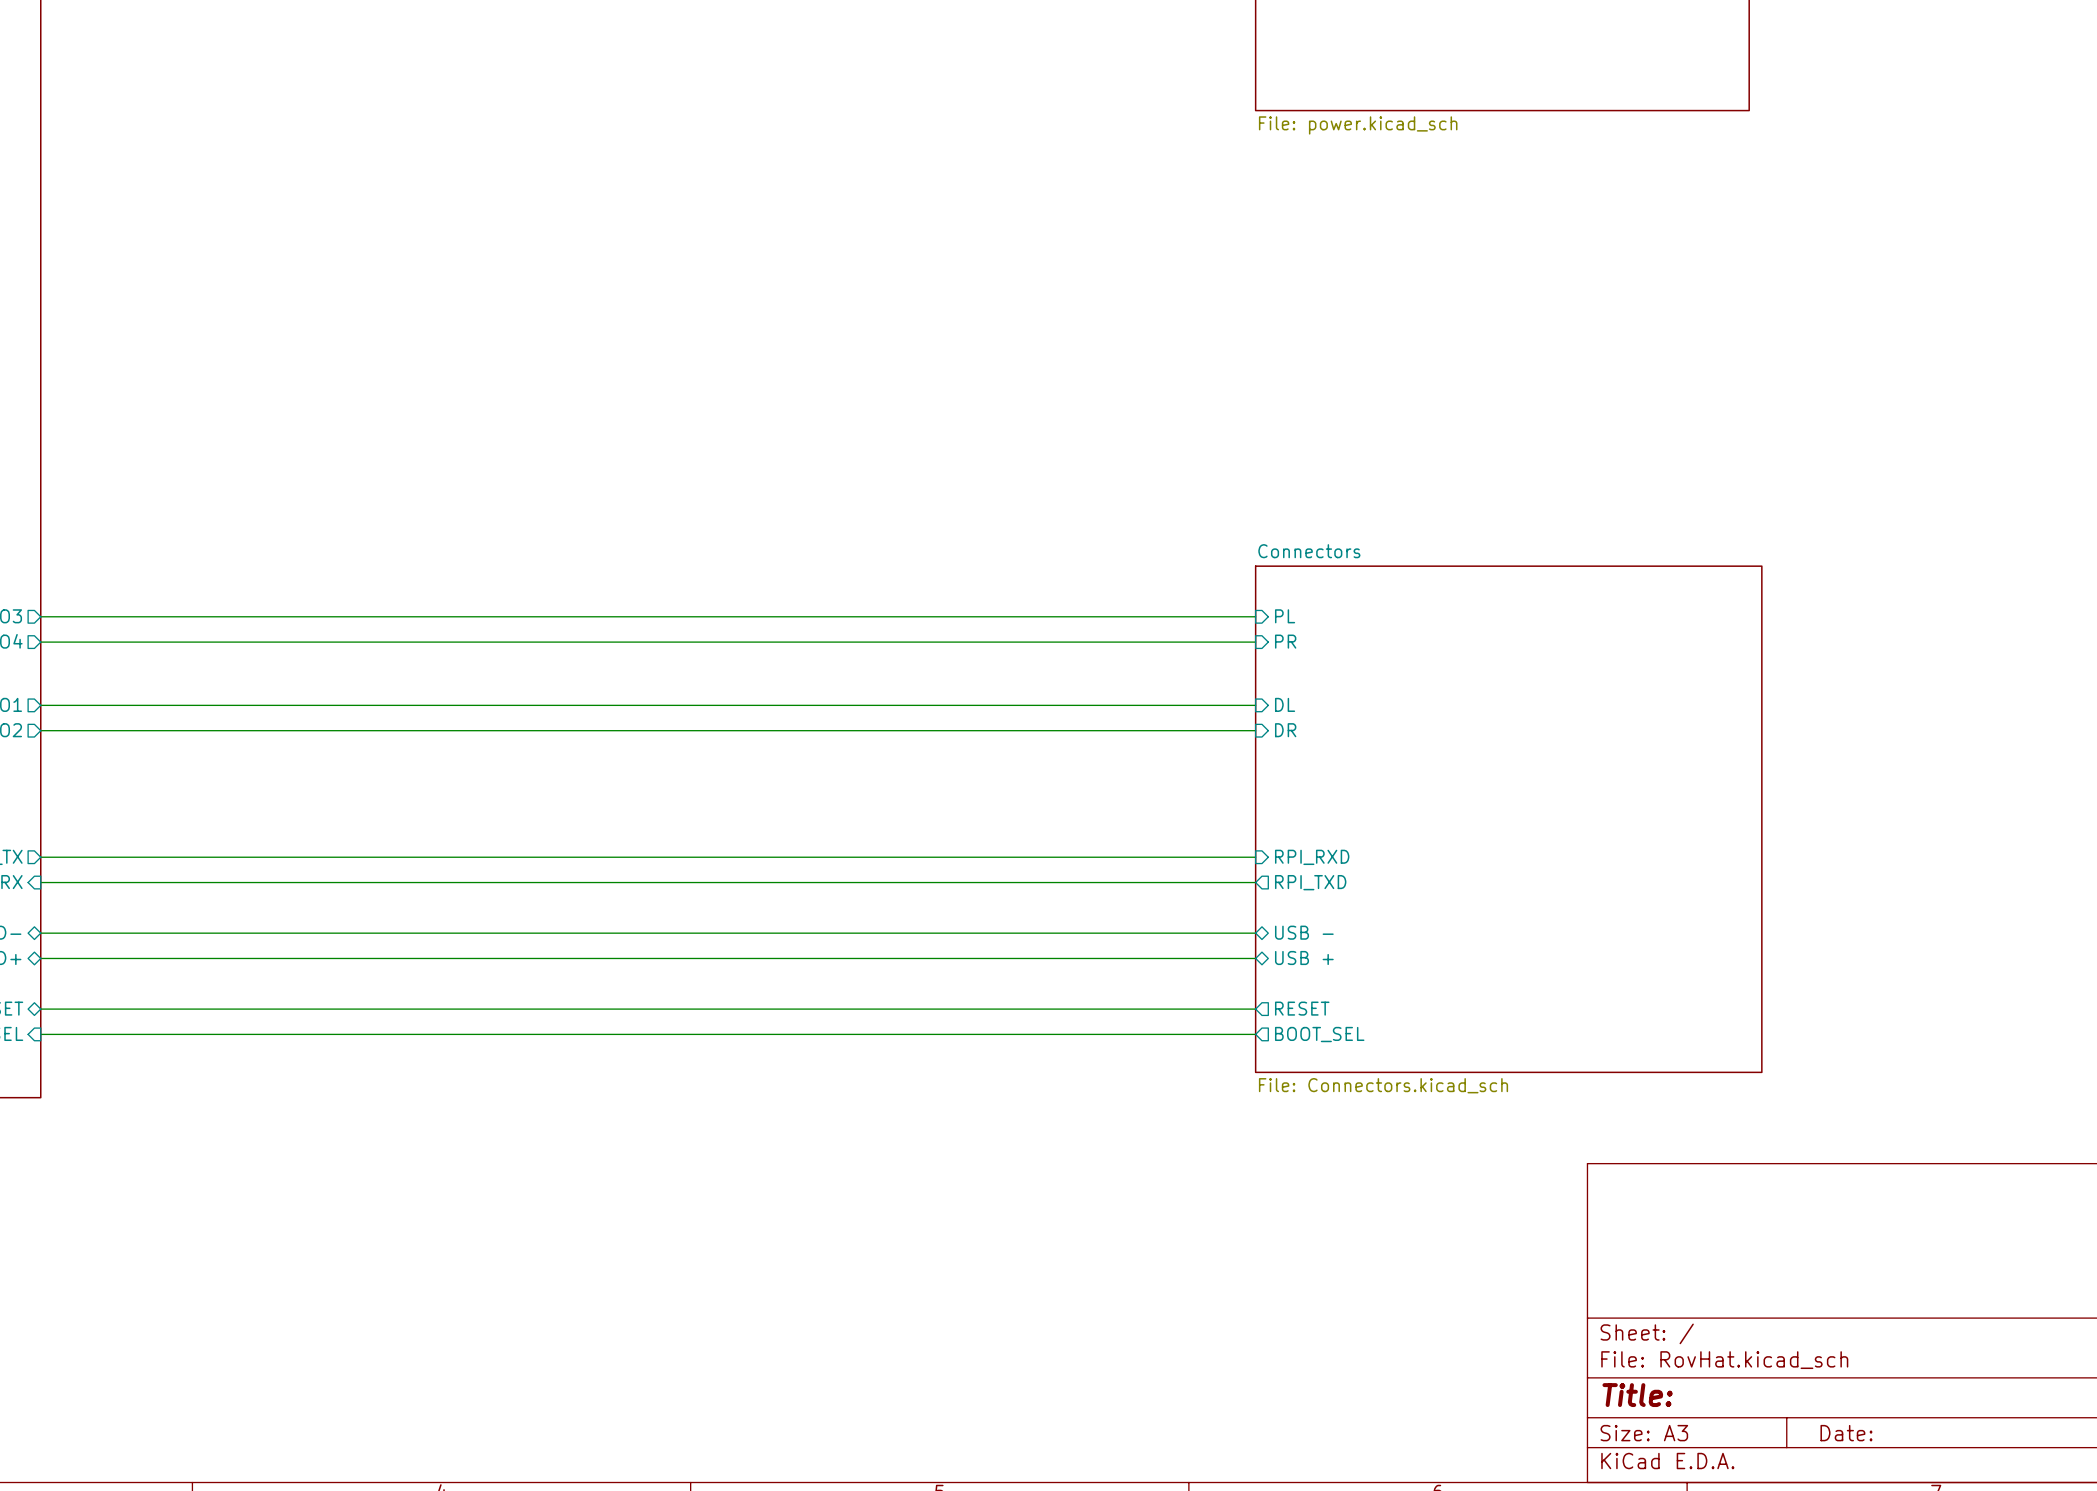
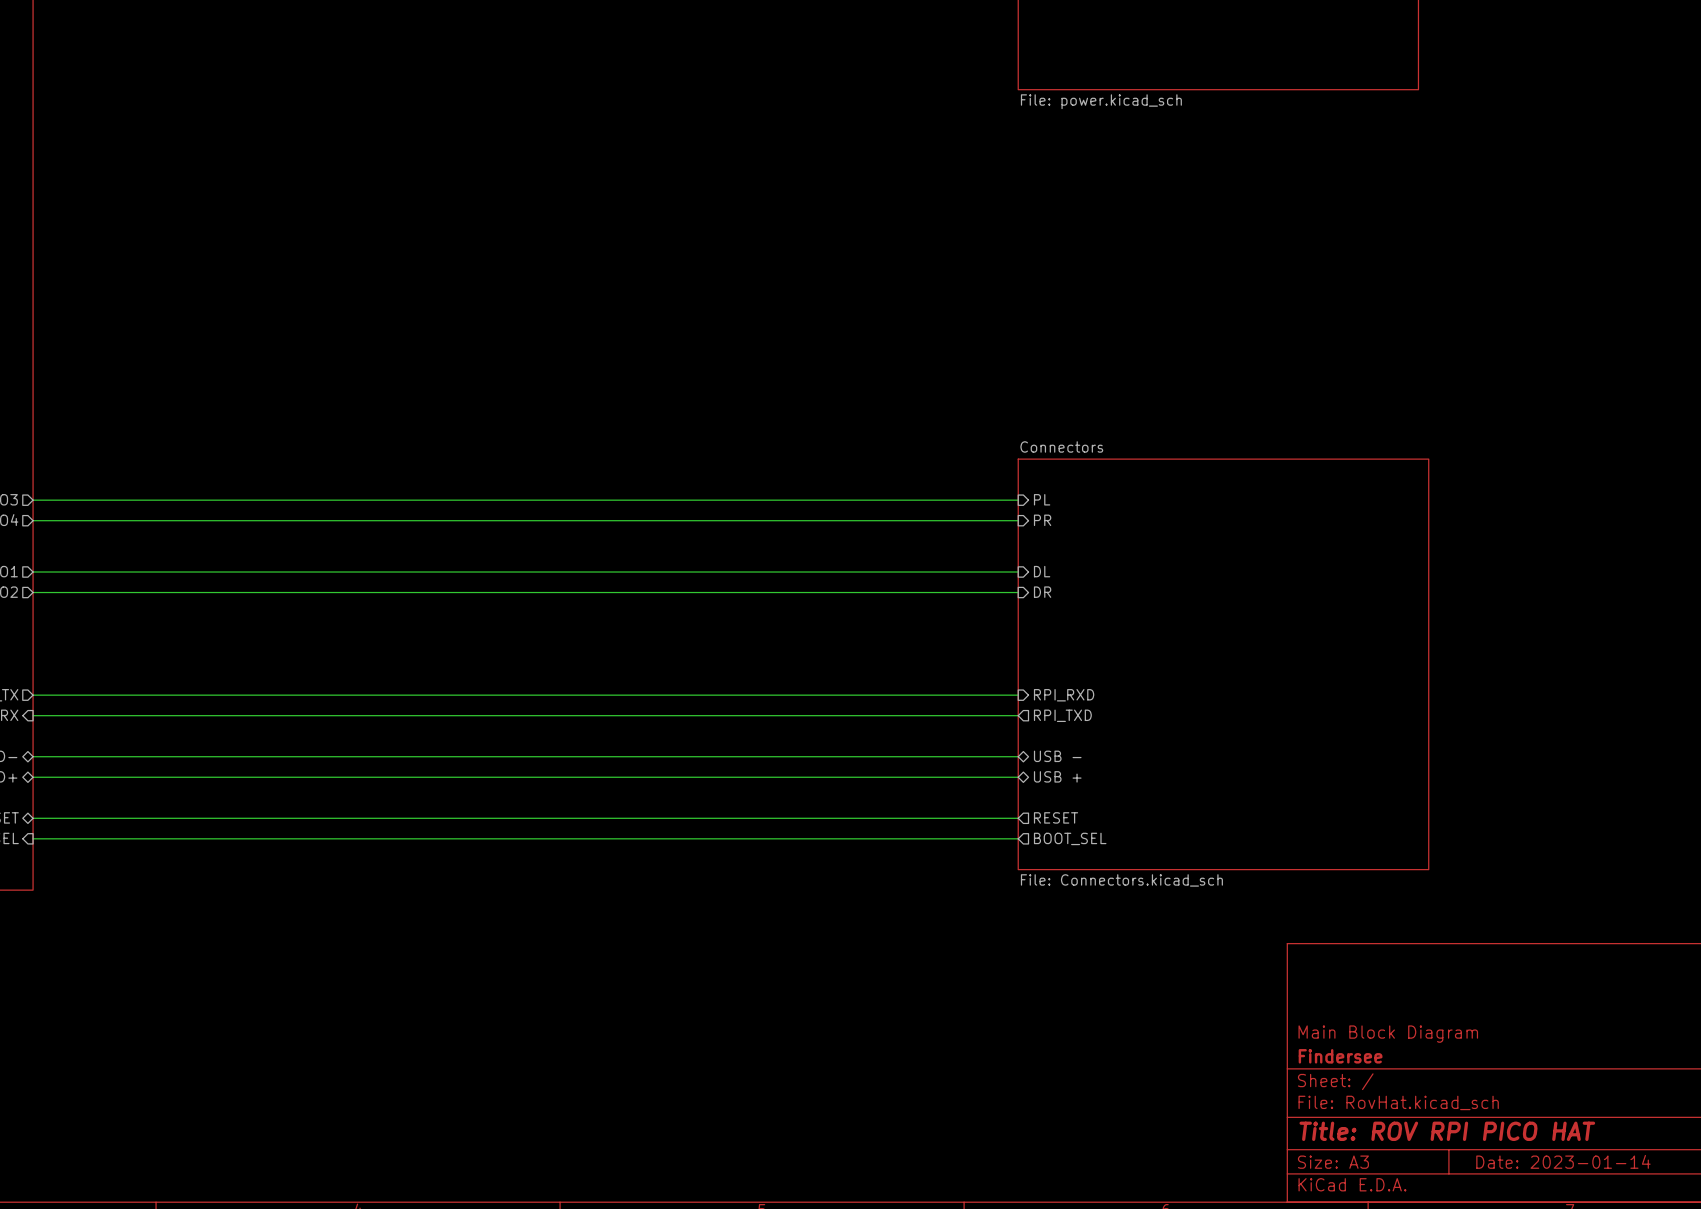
title block: none -> Main Block Diagram (1388, 1034)
title block: none -> Findersee (1340, 1056)
title block: Title: (1637, 1395) -> Title: ROV RPI PICO HAT (1447, 1131)
title block: Date: (1846, 1433) -> Date: 2023-01-14 (1563, 1161)

